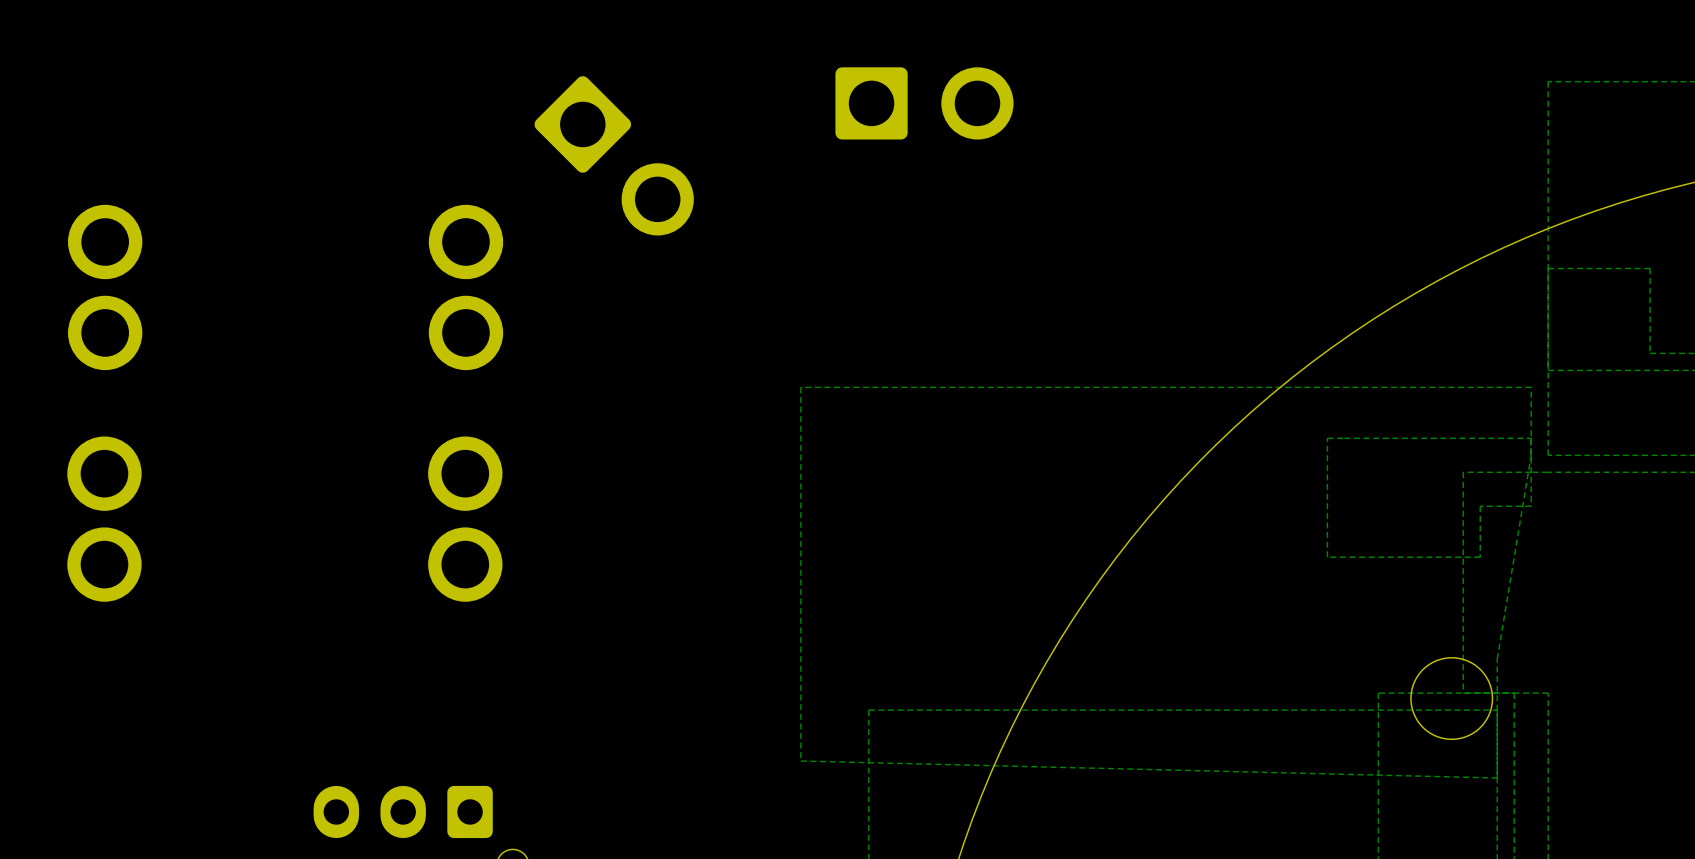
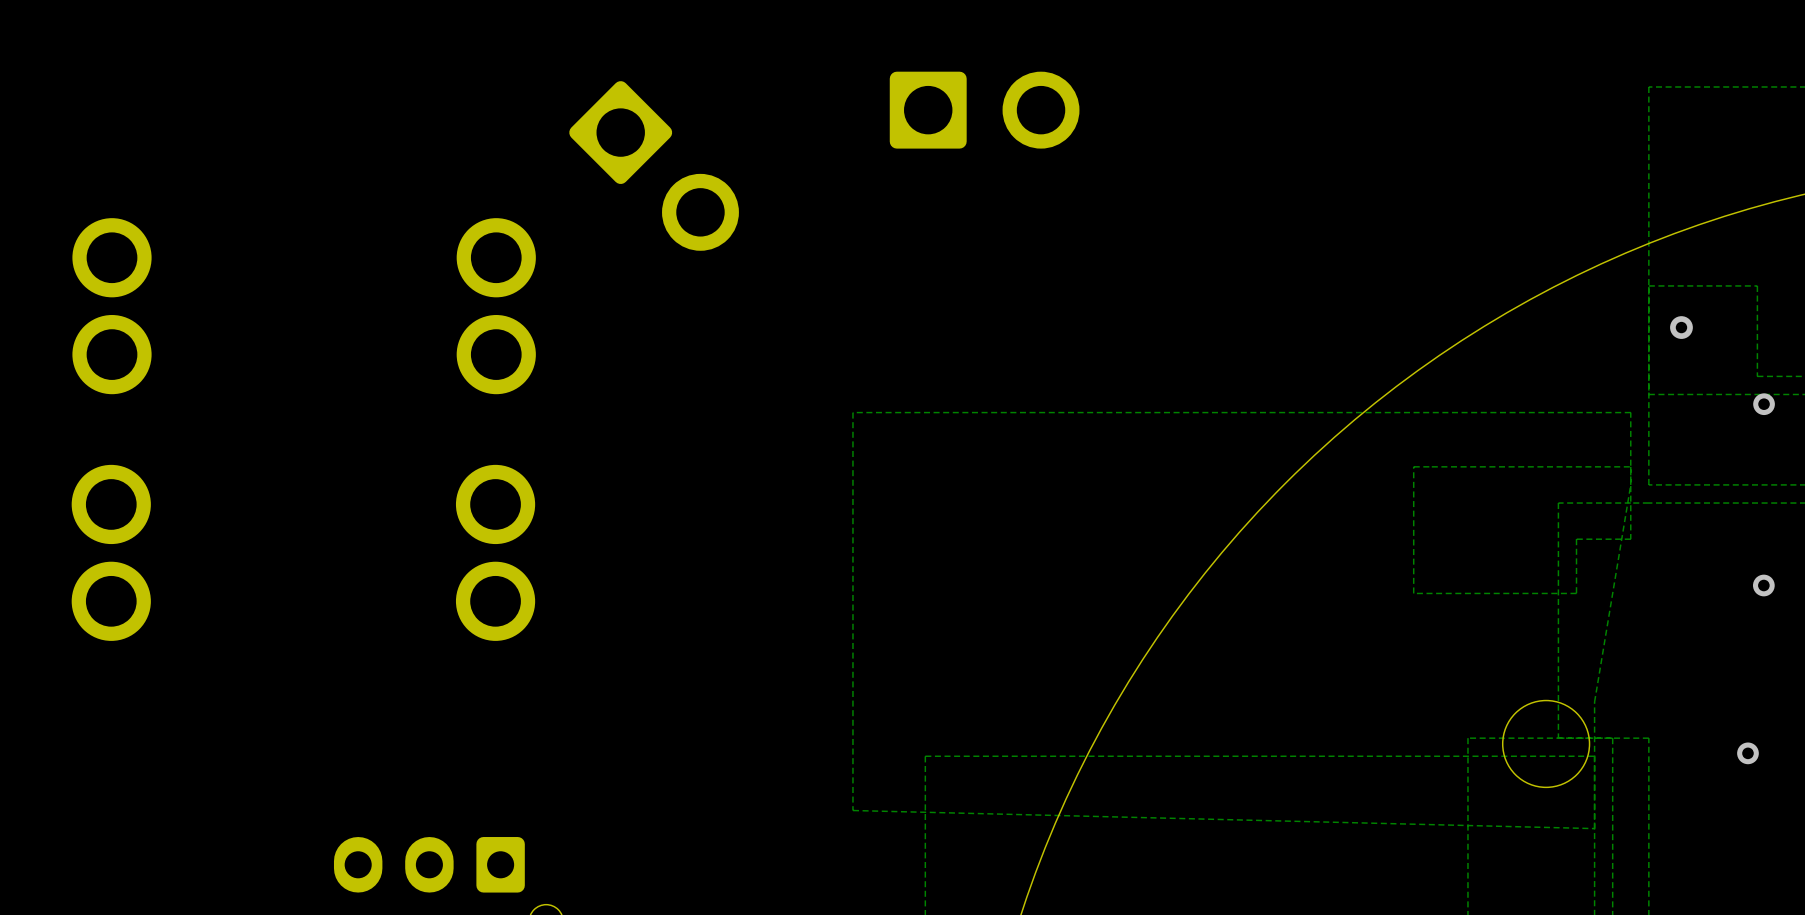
via: none -> (1681, 327)
via: none -> (1764, 404)
via: none -> (1763, 585)
via: none -> (1747, 753)

